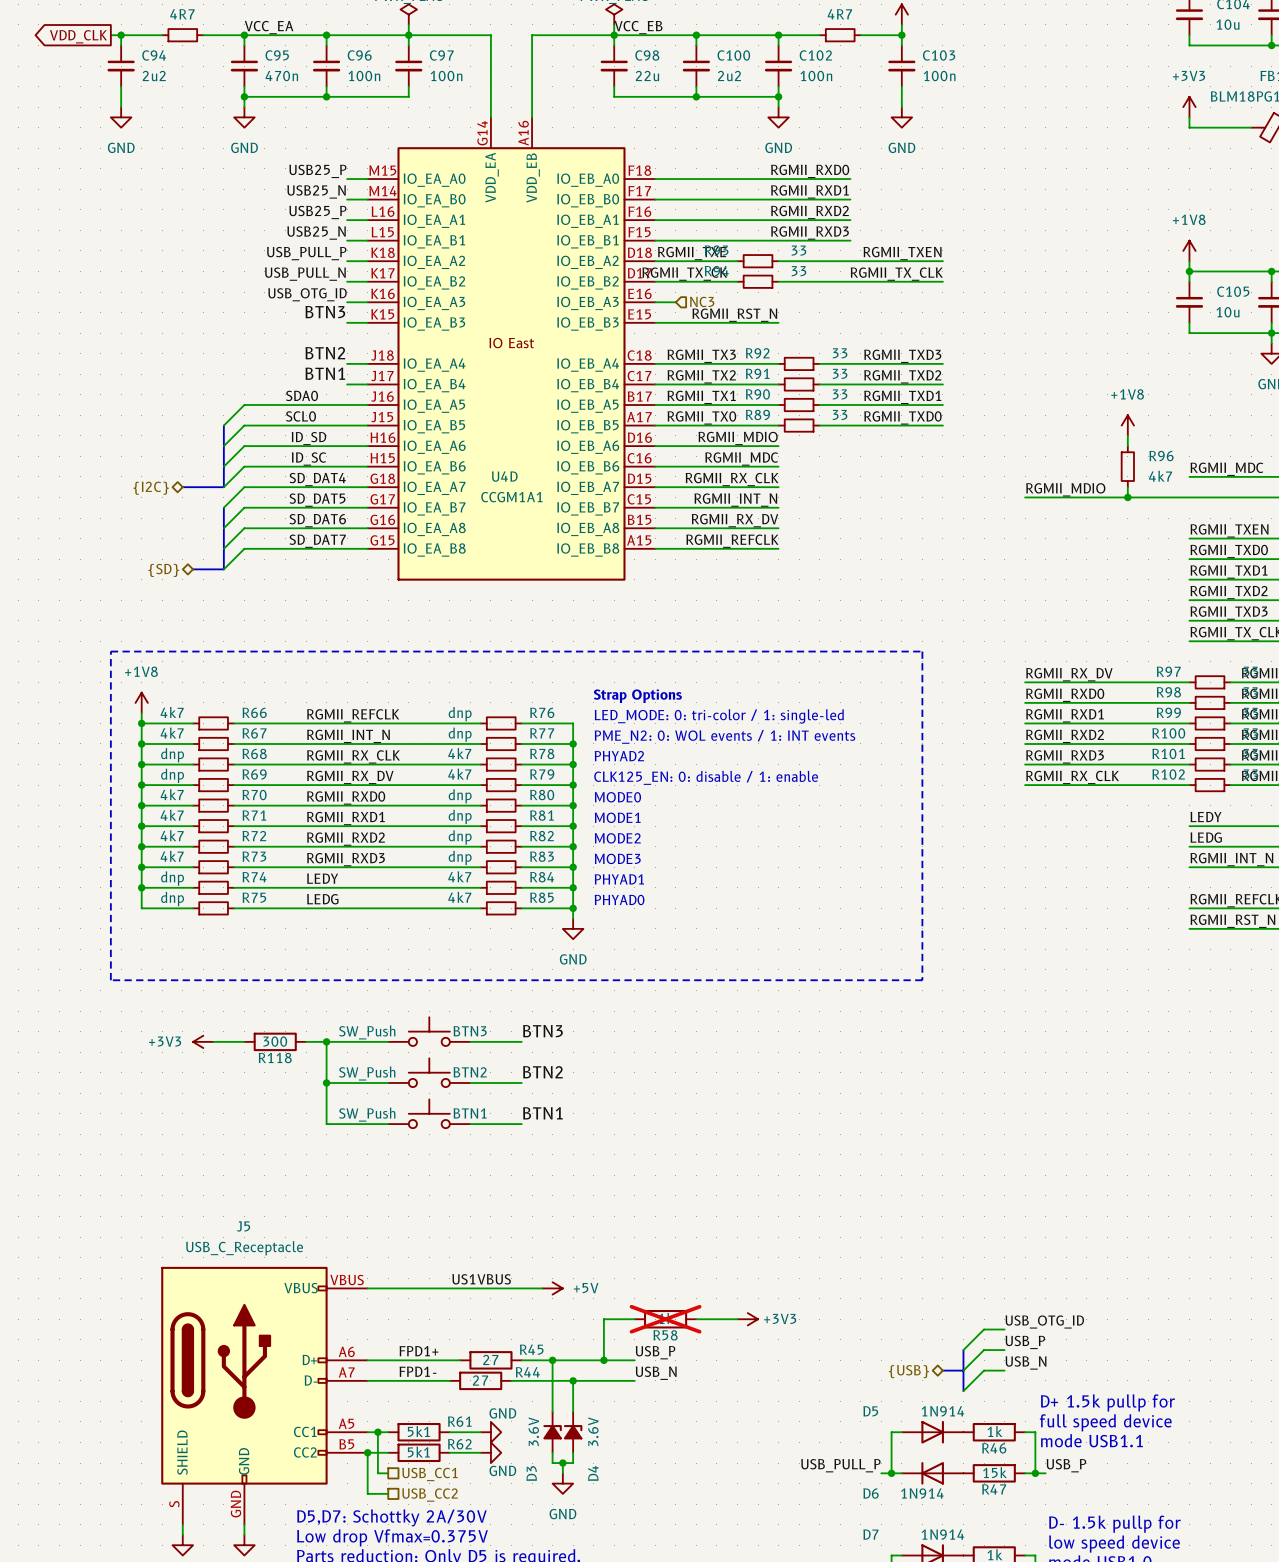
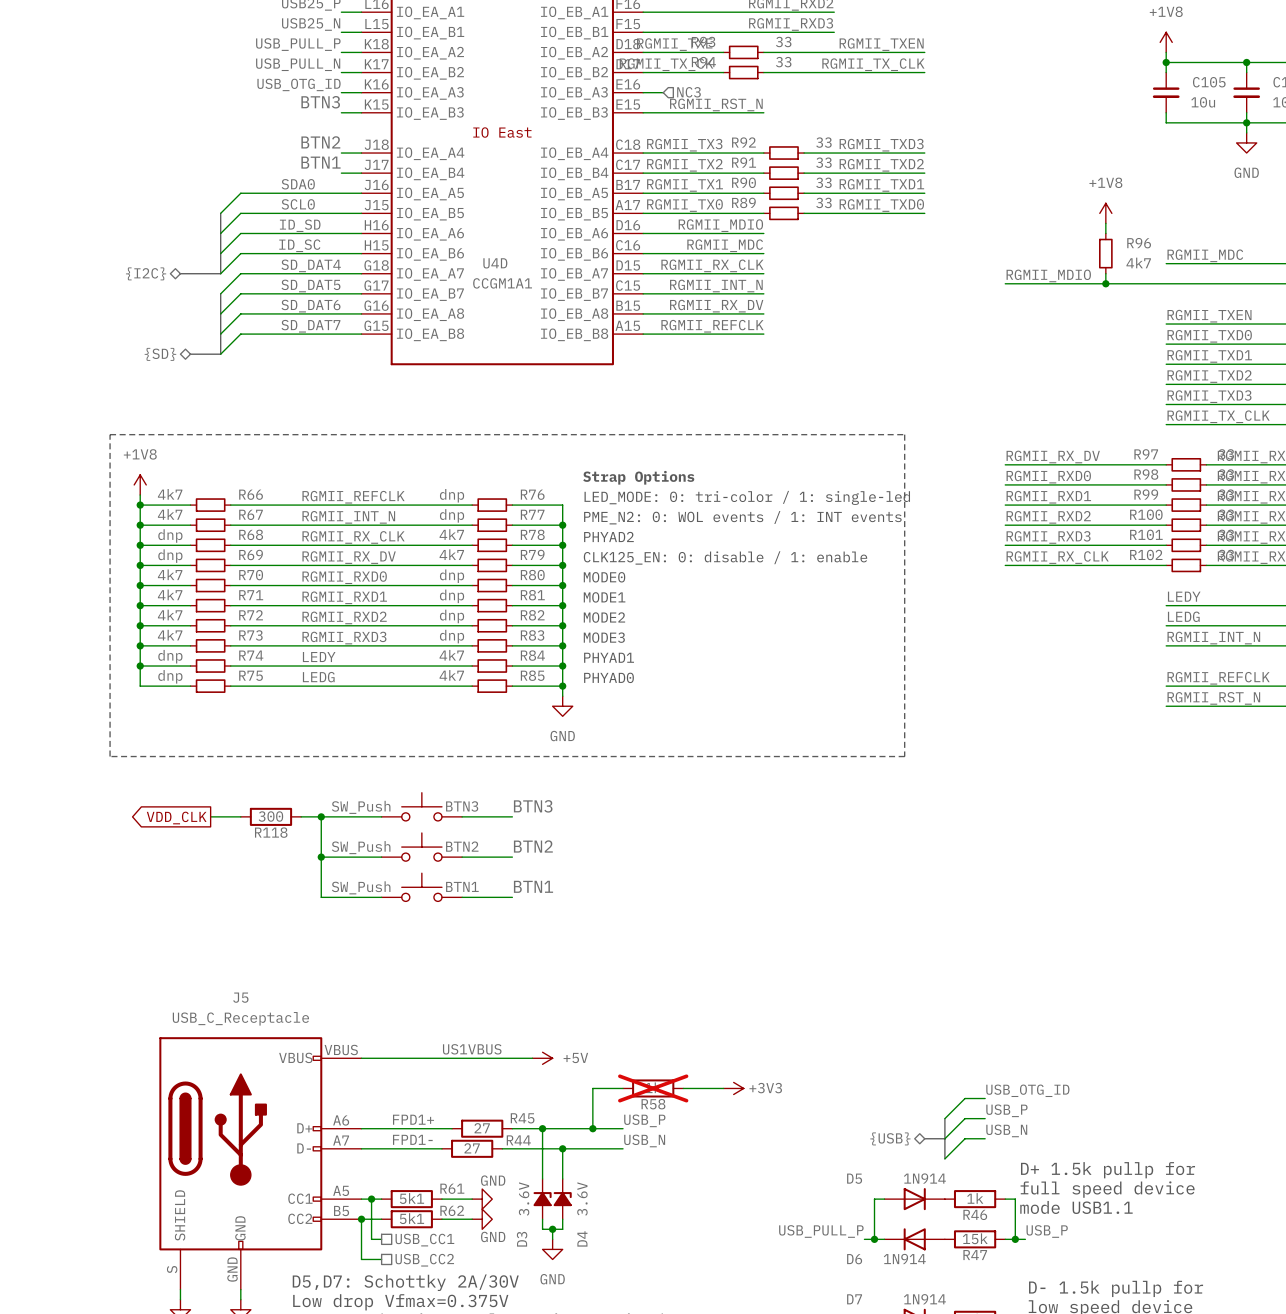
power symbol: +3V3 (203, 1041) -> none
global label: none -> VDD_CLK (176, 818)

